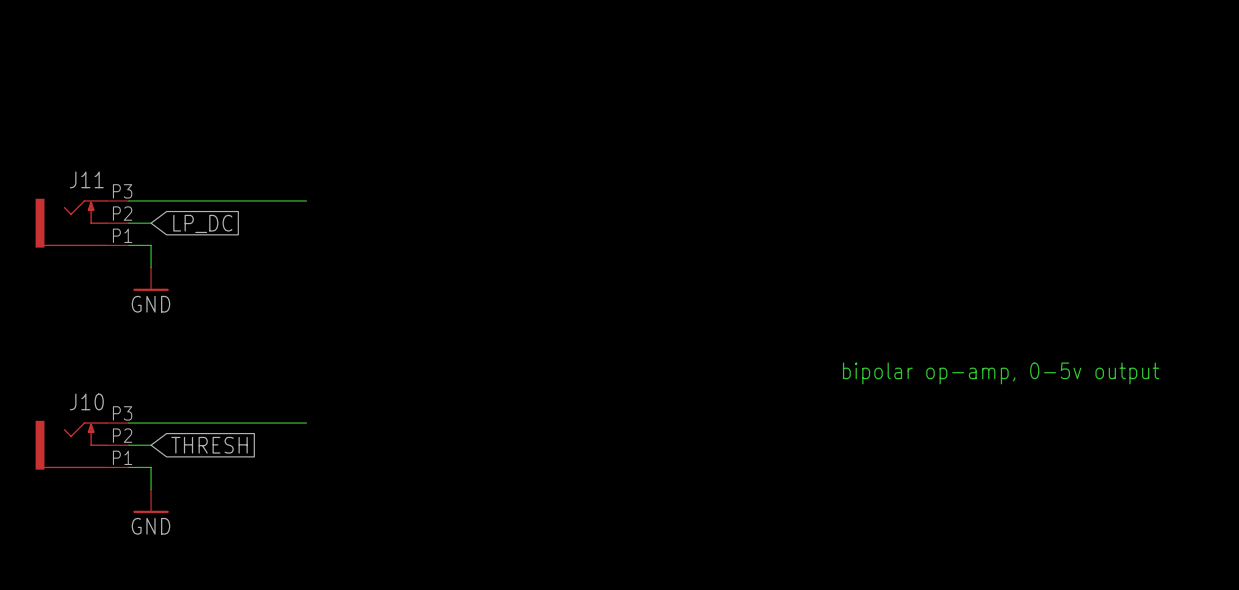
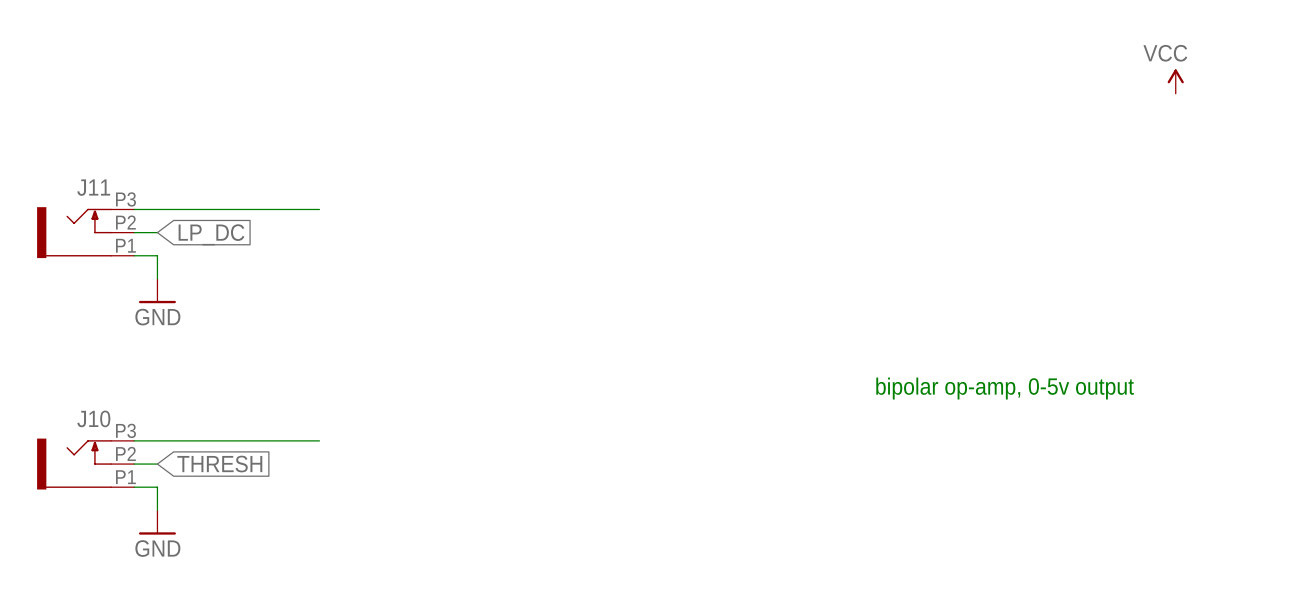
power symbol: none -> VCC (1175, 81)

